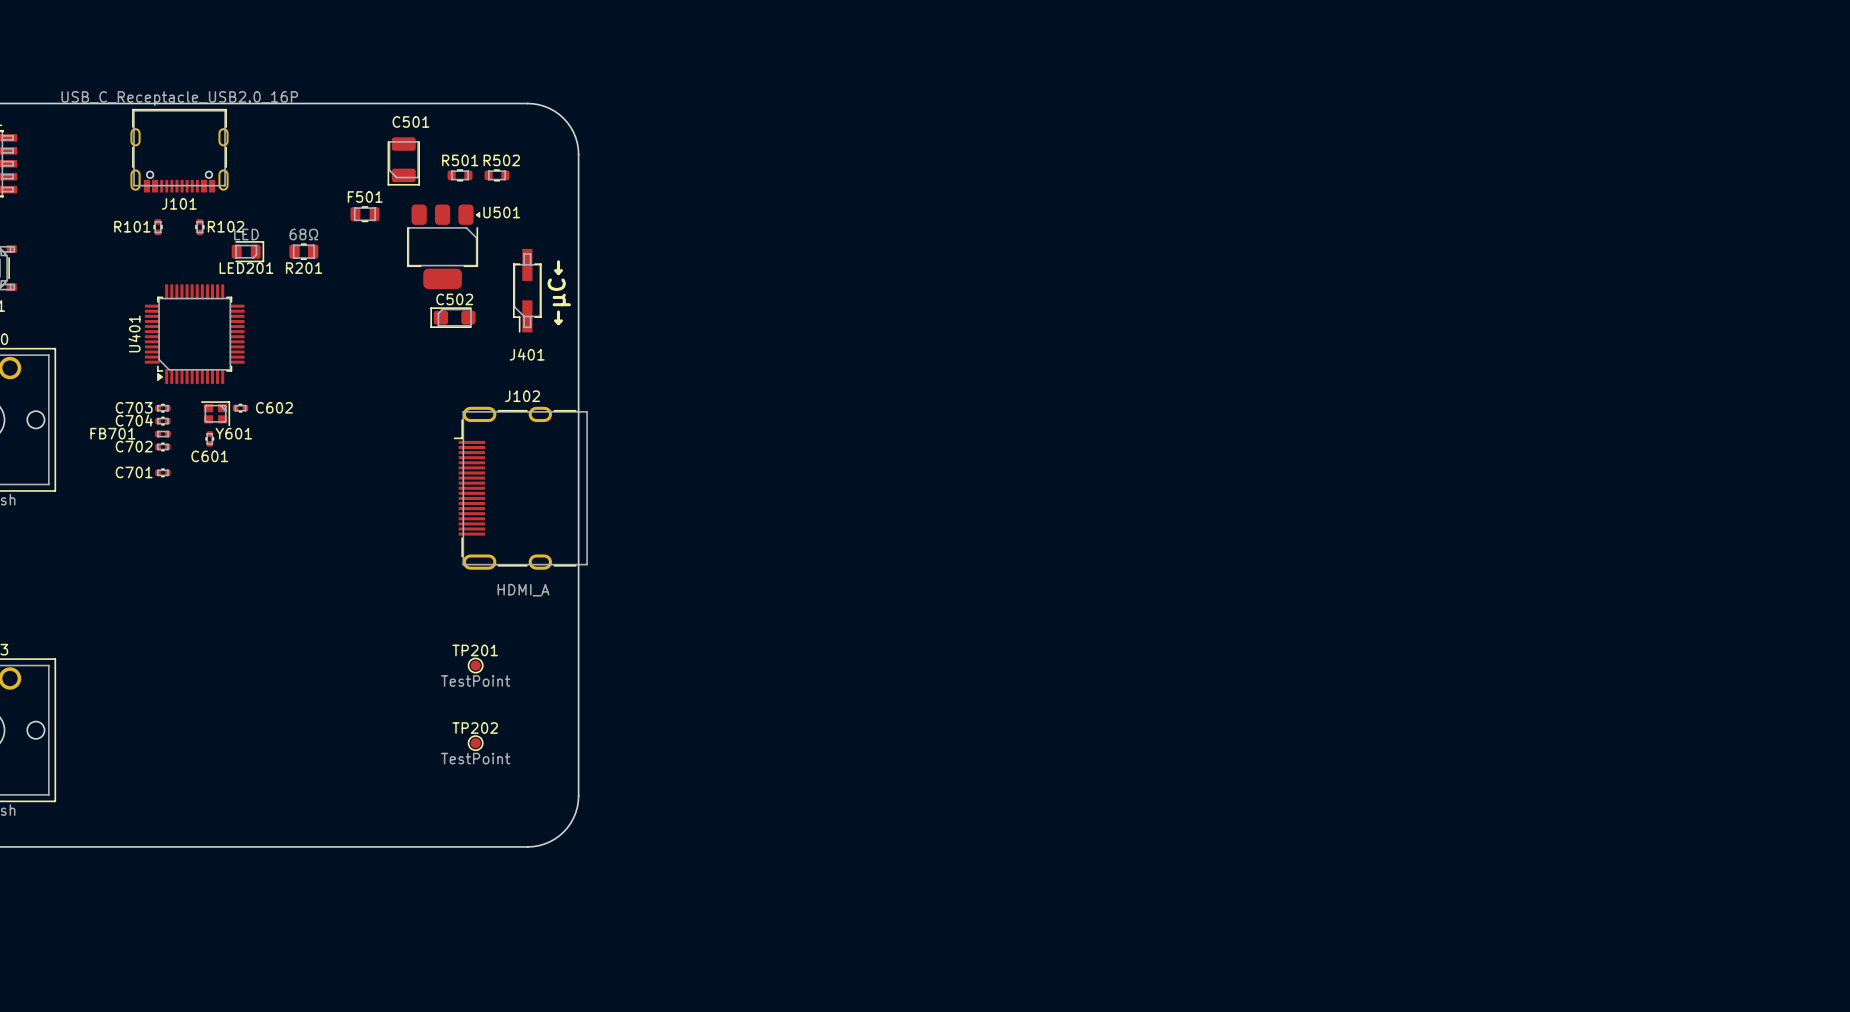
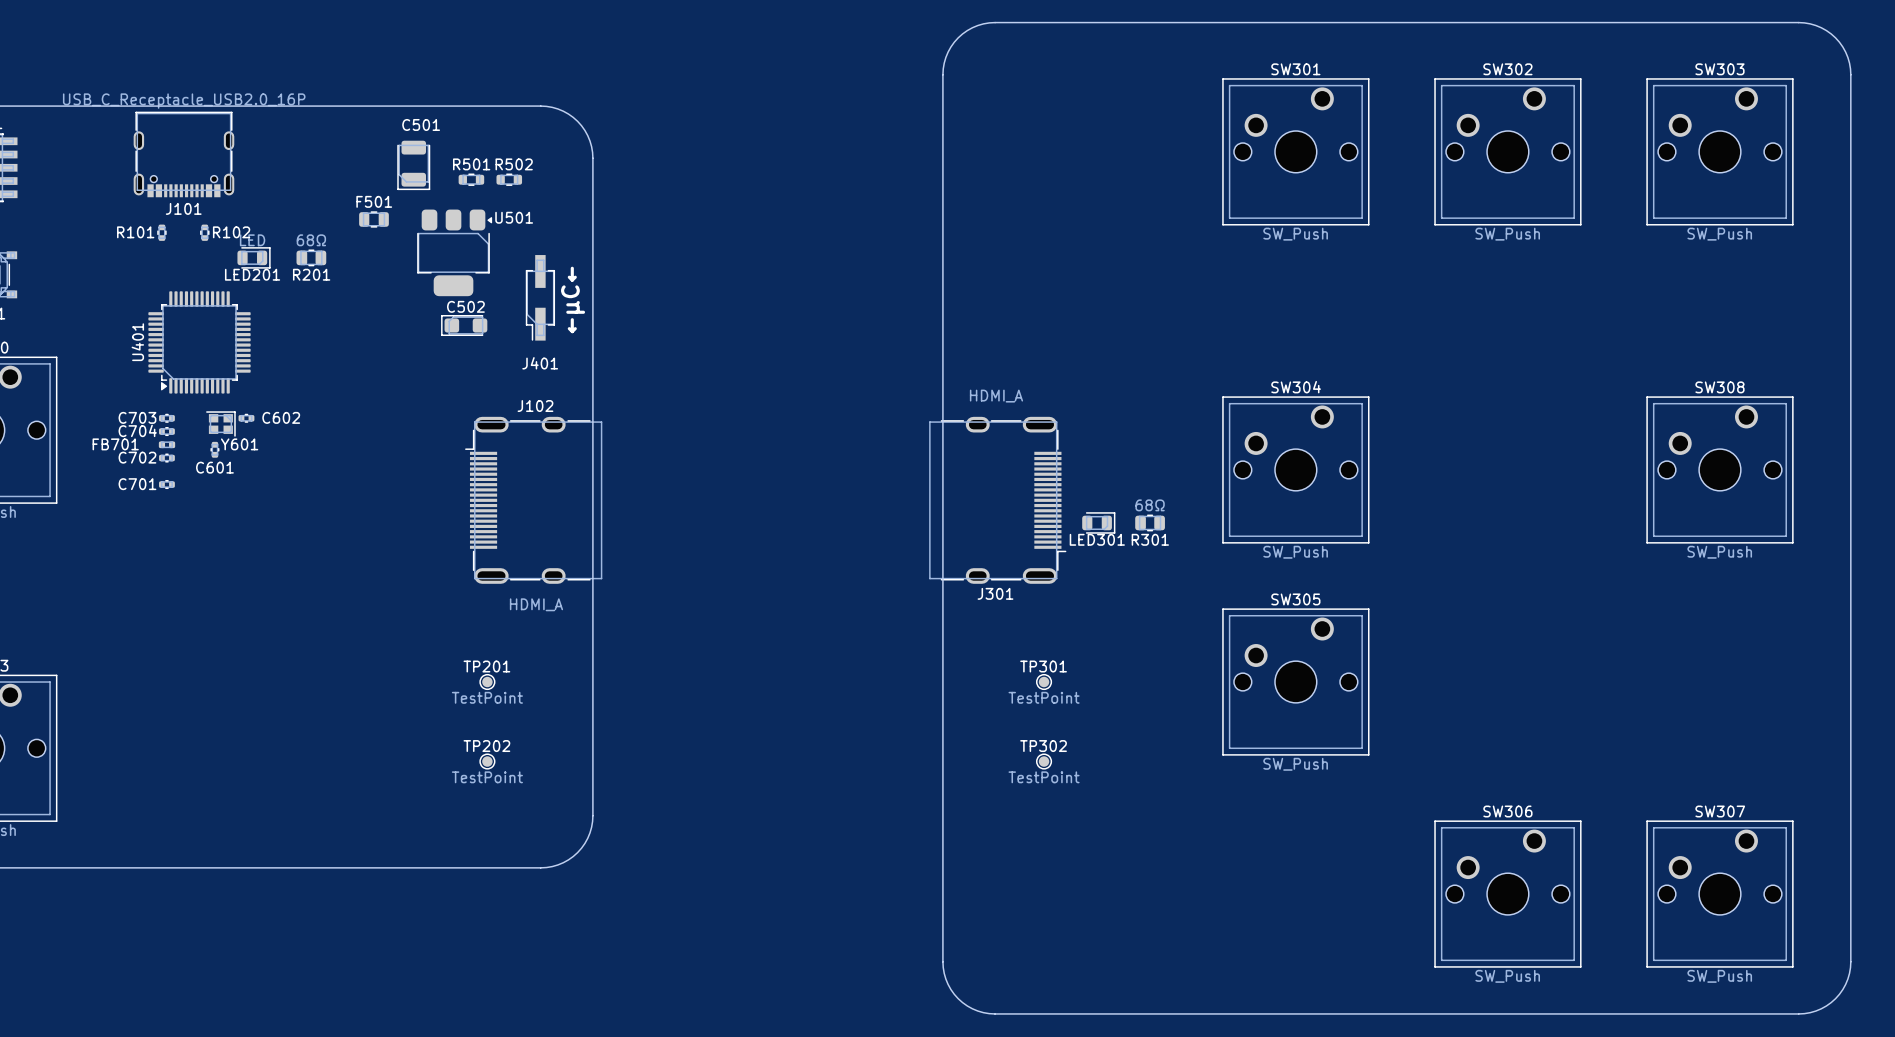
board edge: none -> (995, 22) (1798, 22) (1821, 27) (1839, 42) (1847, 57) (1850, 74) (1850, 961) (1845, 984) (1831, 1002) (1815, 1011) (1798, 1013) (995, 1013) (972, 1008) (954, 994) (945, 979) (942, 961) (942, 74) (948, 52) (958, 37) (977, 25) (995, 22)
SW301: none -> SW_Push (1295, 151)
SW302: none -> SW_Push (1507, 151)
SW303: none -> SW_Push (1719, 151)
SW304: none -> SW_Push (1295, 469)
SW308: none -> SW_Push (1719, 469)
J301: none -> HDMI_A (997, 500)
LED301: none -> (1098, 522)
R301: none -> 68Ω (1150, 522)
TP301: none -> TestPoint (1044, 682)
SW305: none -> SW_Push (1295, 682)
TP302: none -> TestPoint (1044, 761)
SW306: none -> SW_Push (1507, 894)
SW307: none -> SW_Push (1719, 894)

